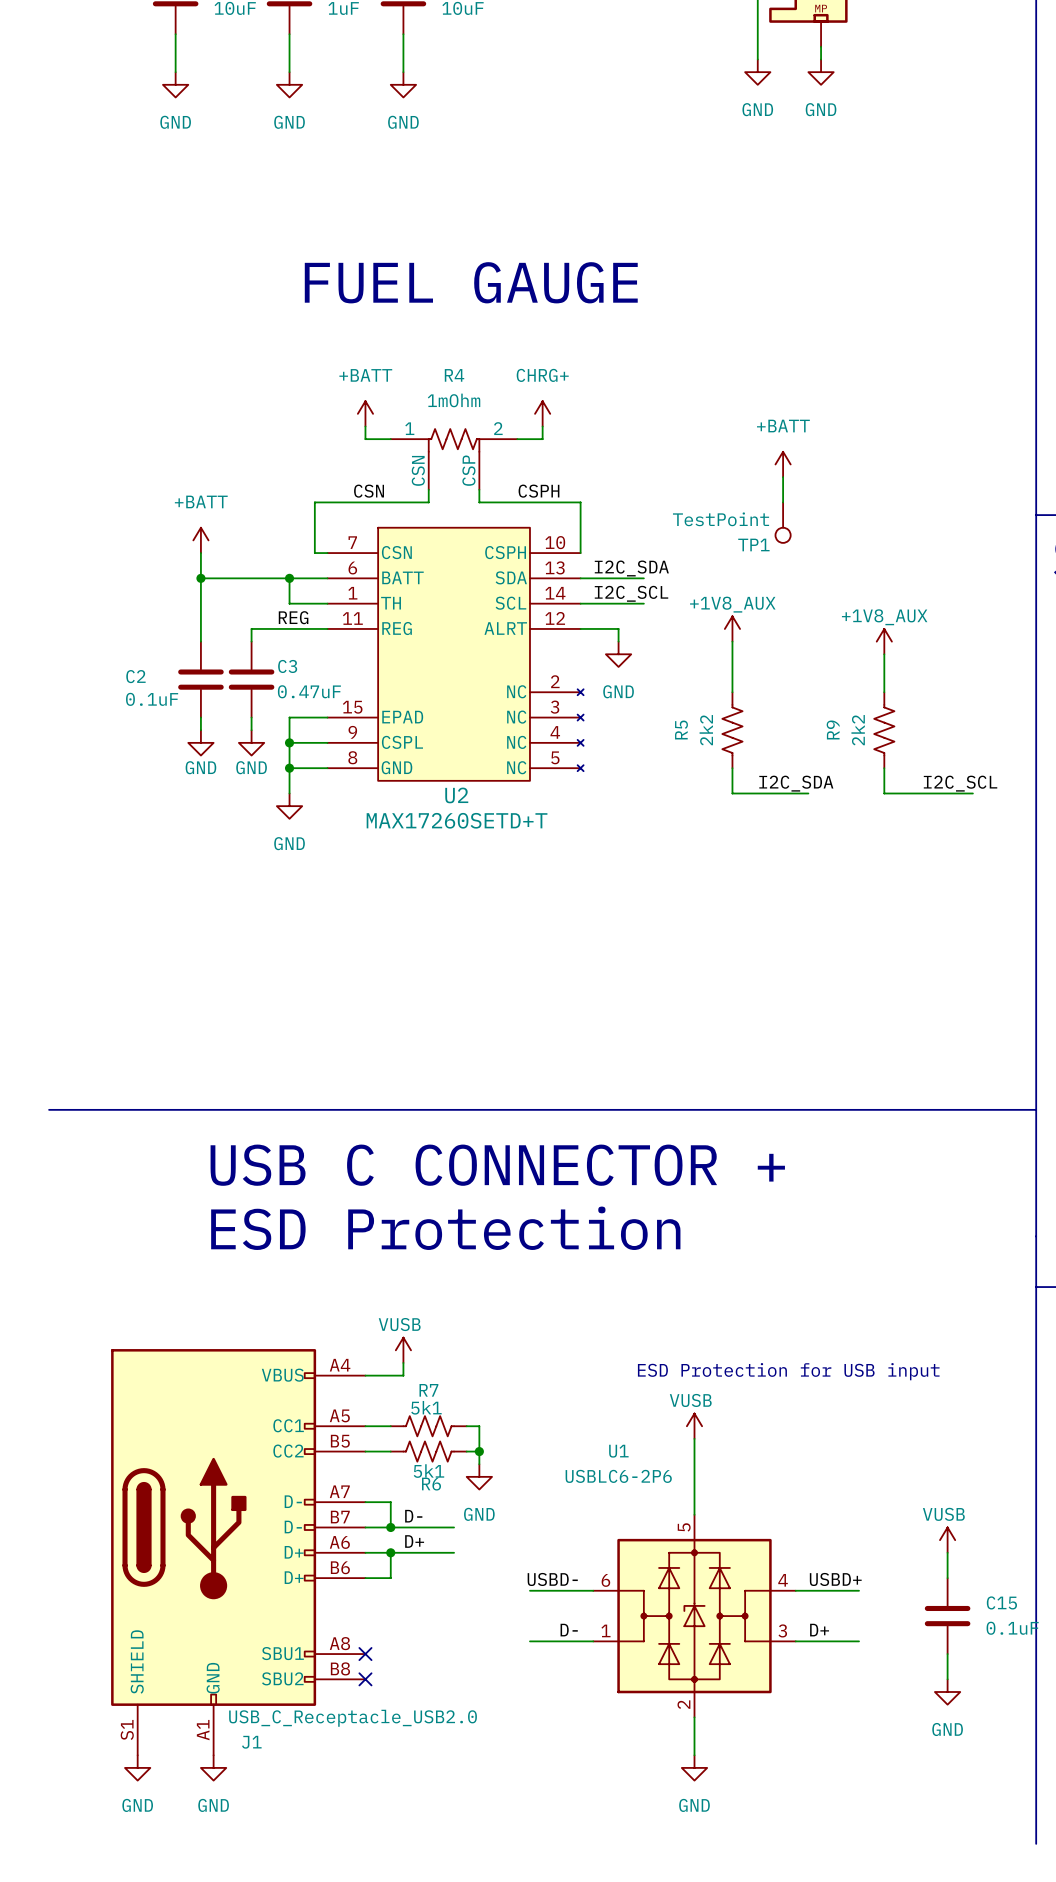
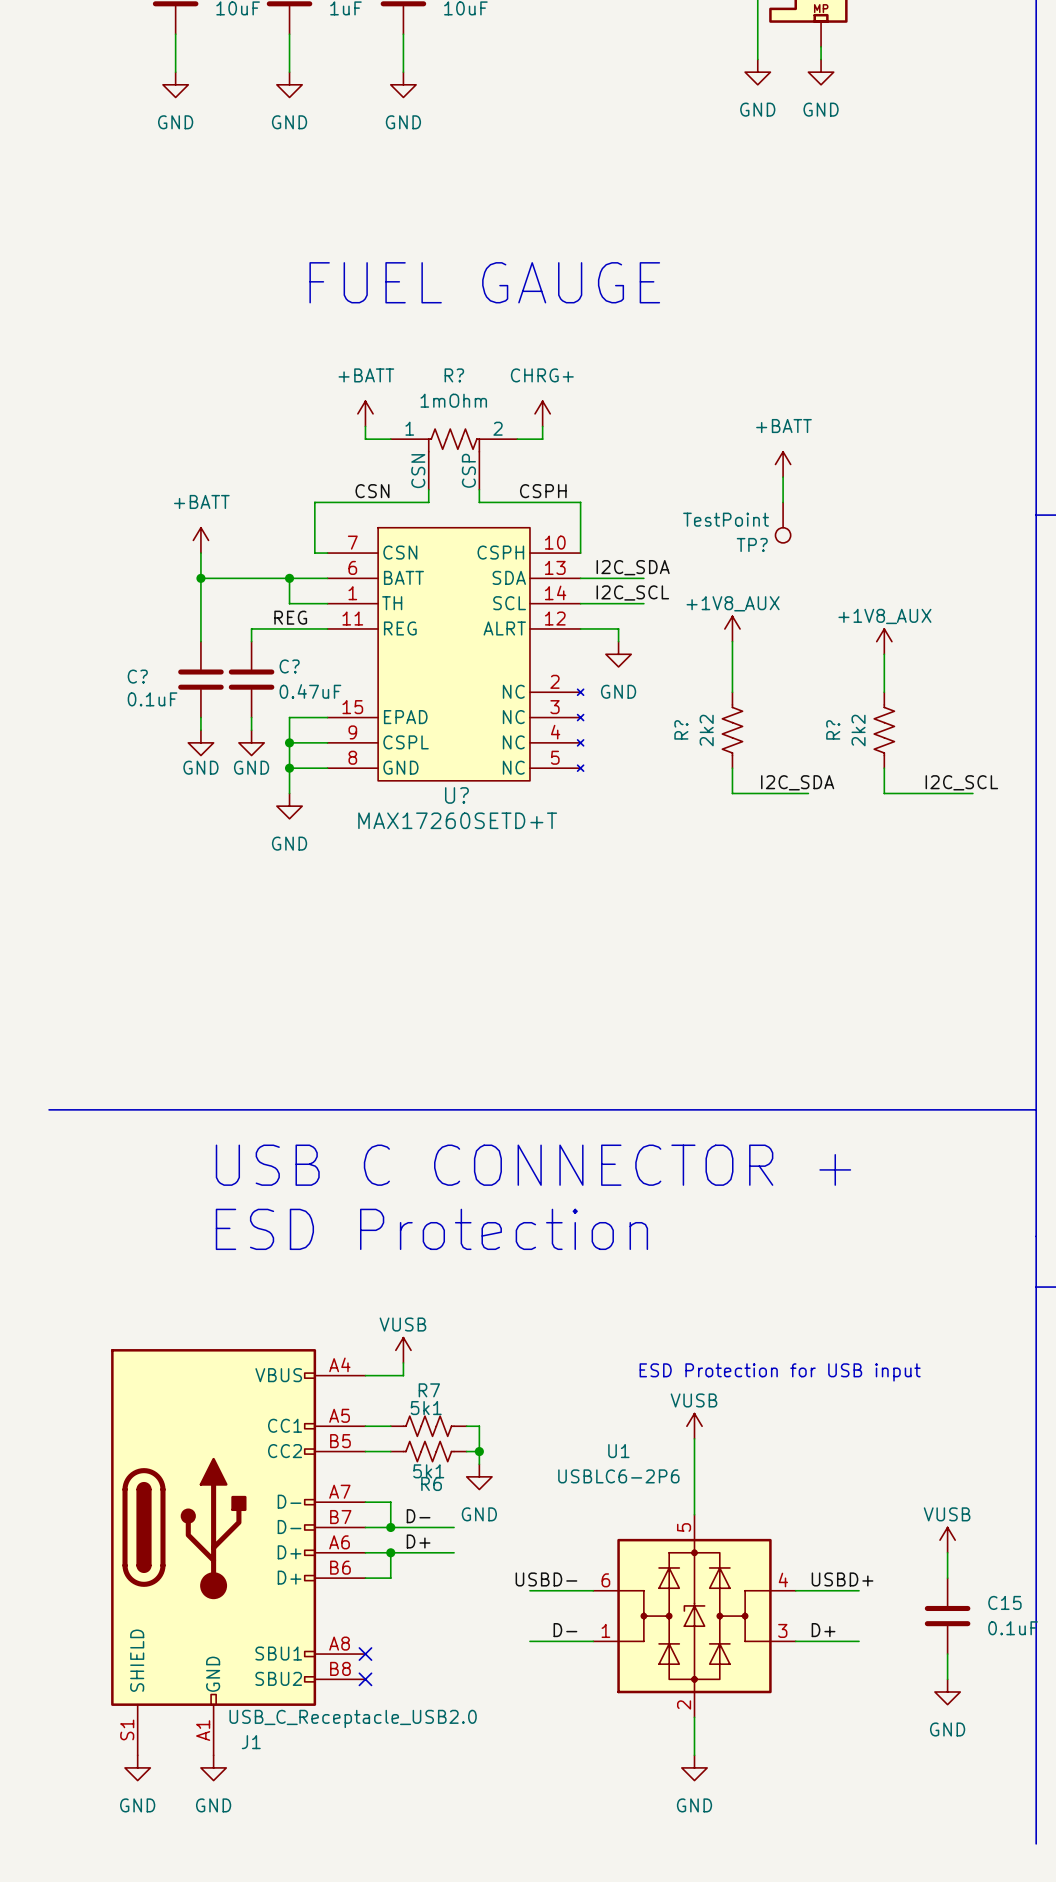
R4 name: R4 (454, 375) -> R? (454, 375)
TP1 name: TP1 (753, 544) -> TP? (752, 544)
C3 name: C3 (287, 666) -> C? (289, 666)
C2 name: C2 (135, 676) -> C? (137, 676)
R9 name: R9 (833, 729) -> R? (833, 729)
R5 name: R5 (681, 730) -> R? (681, 729)
U2 name: U2 (456, 795) -> U? (456, 795)

